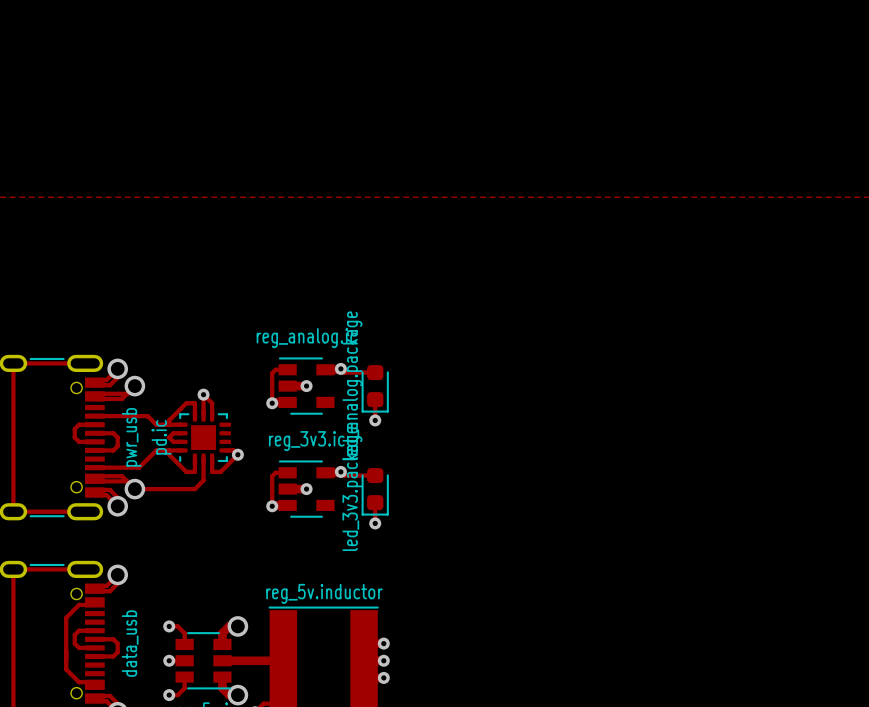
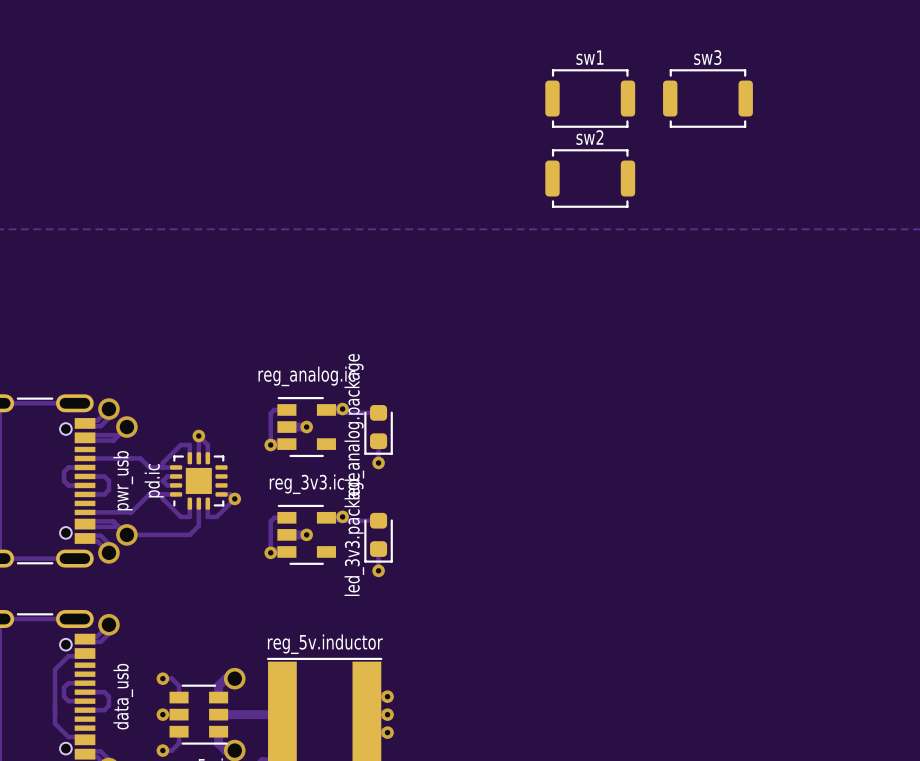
sw1: none -> (590, 98)
sw3: none -> (707, 98)
sw2: none -> (590, 178)

